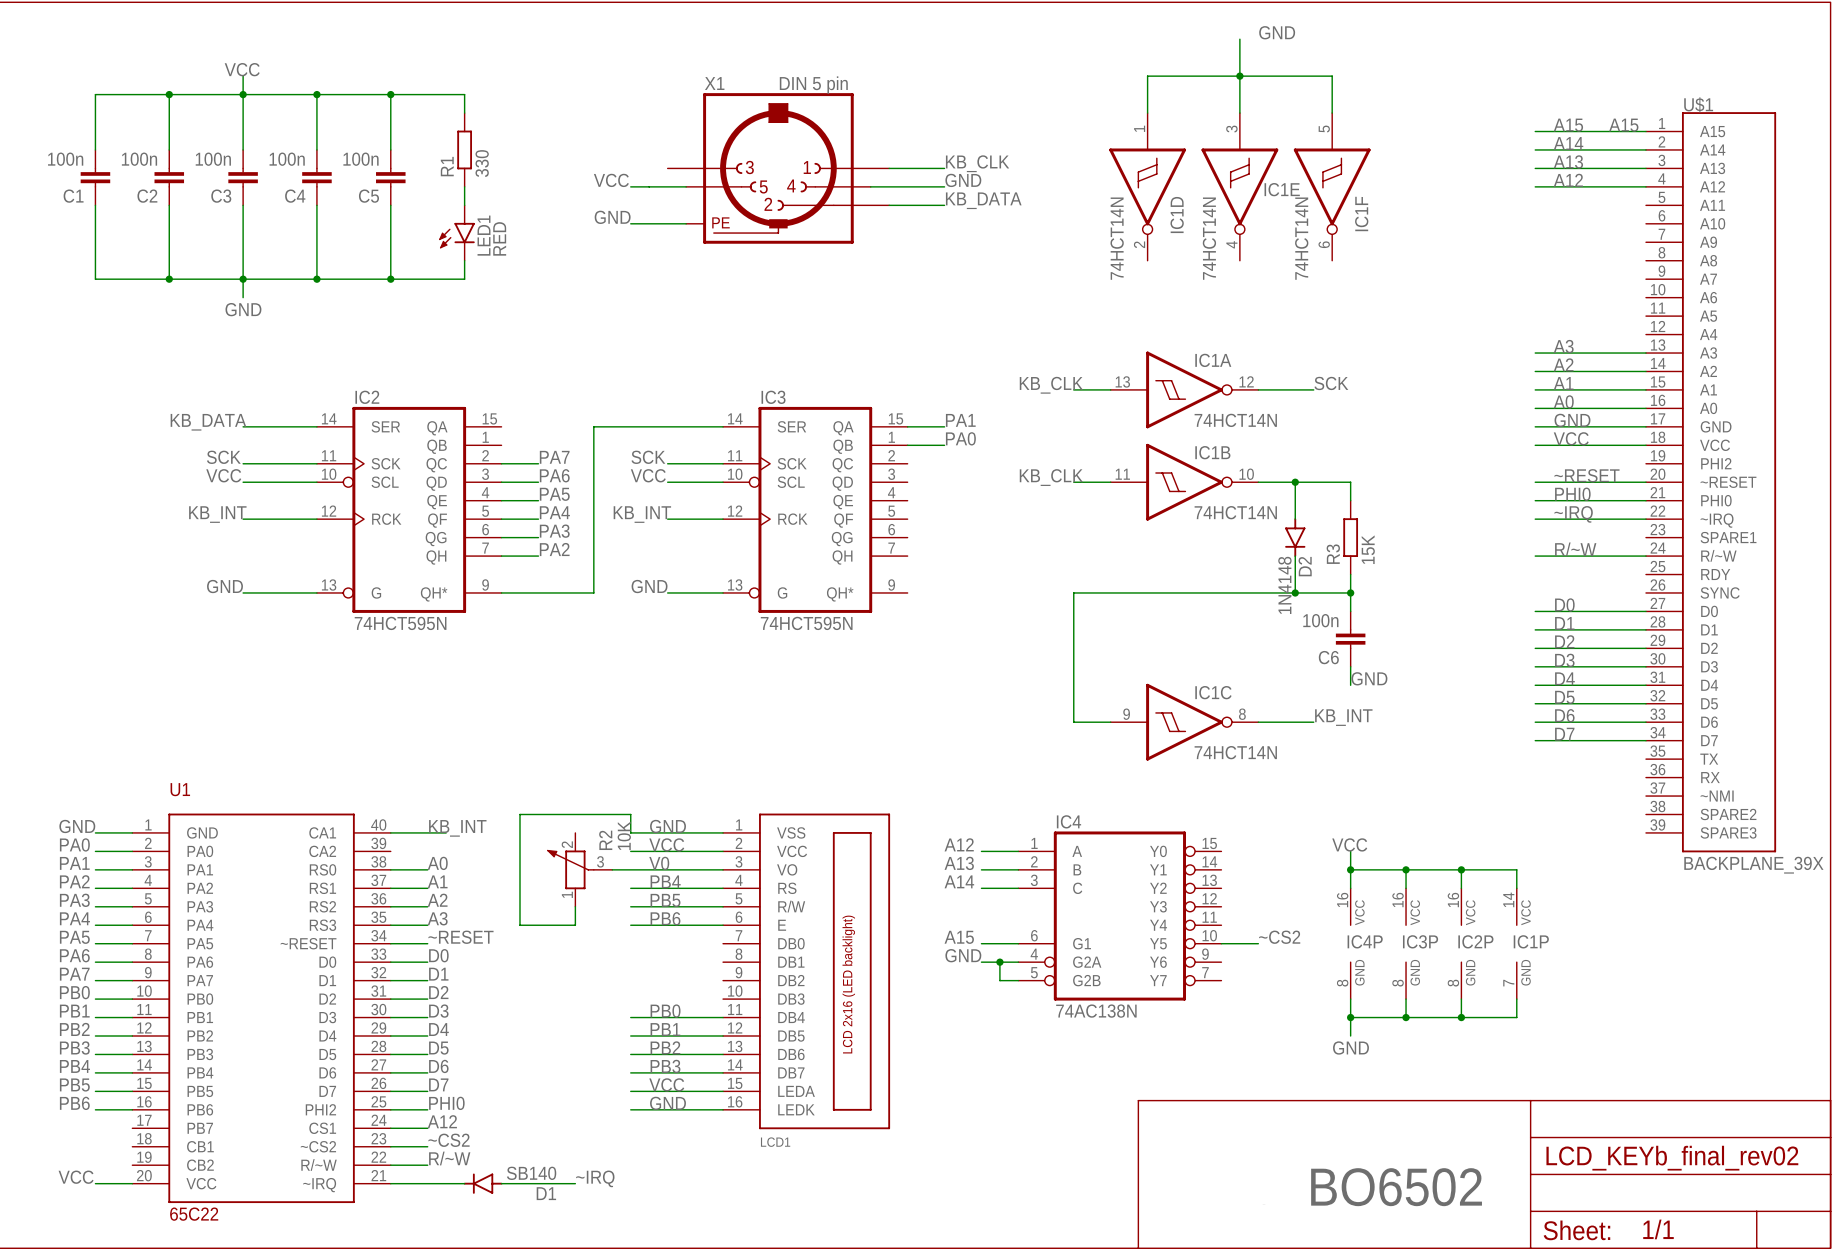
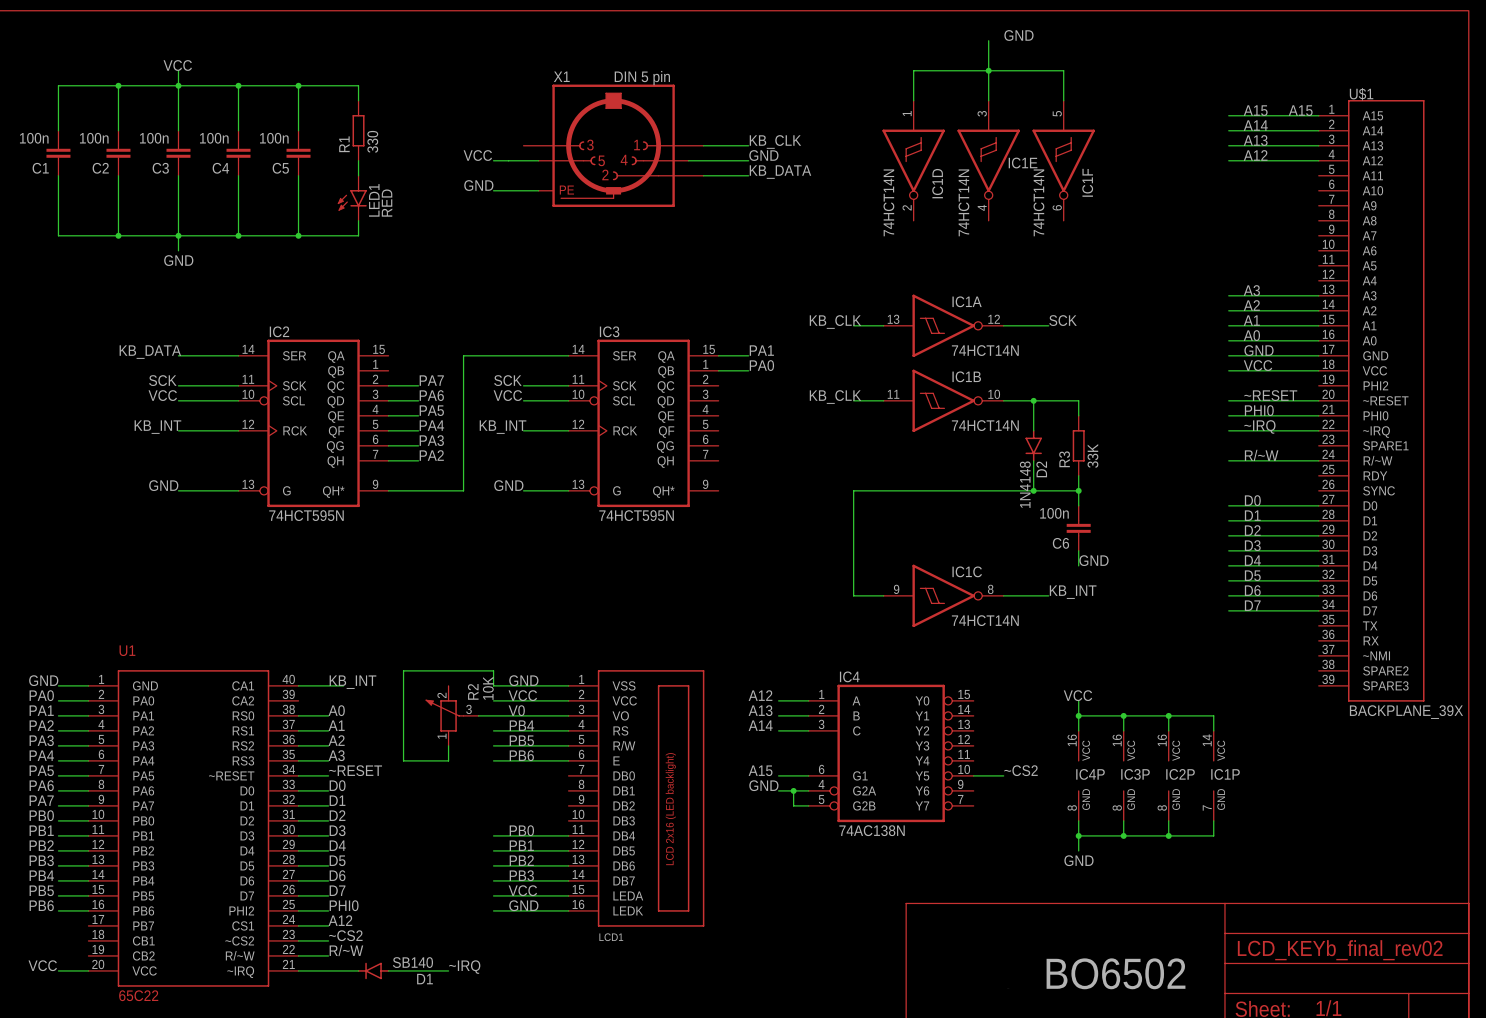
R3 value: 15K (1368, 549) -> 33K (1092, 455)

